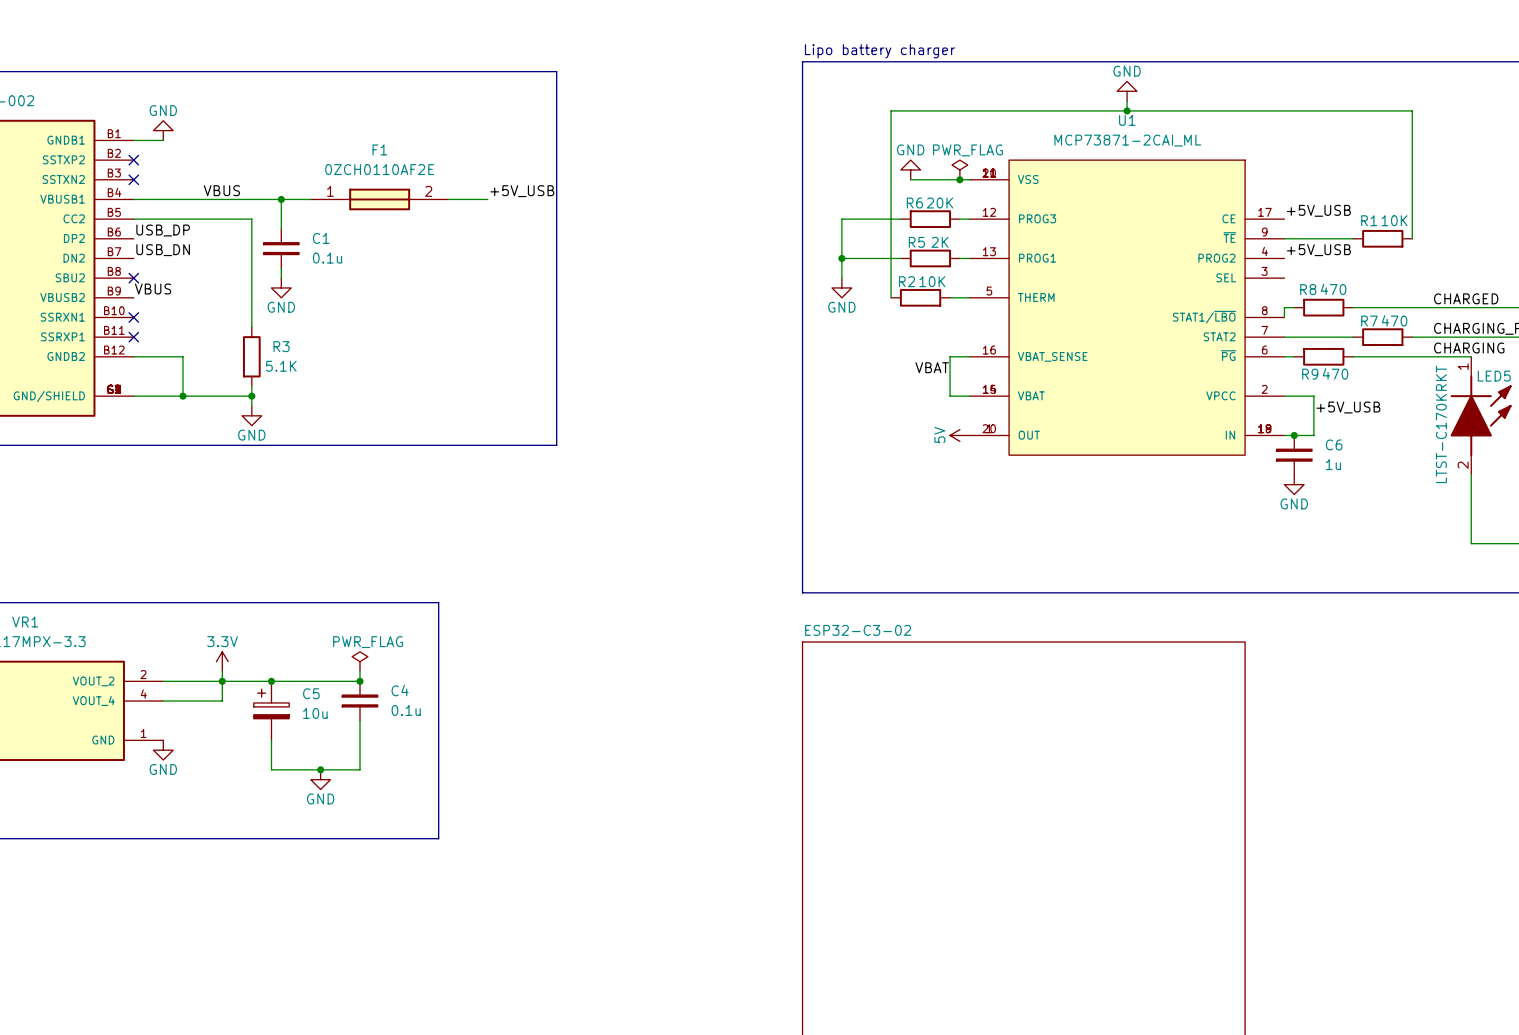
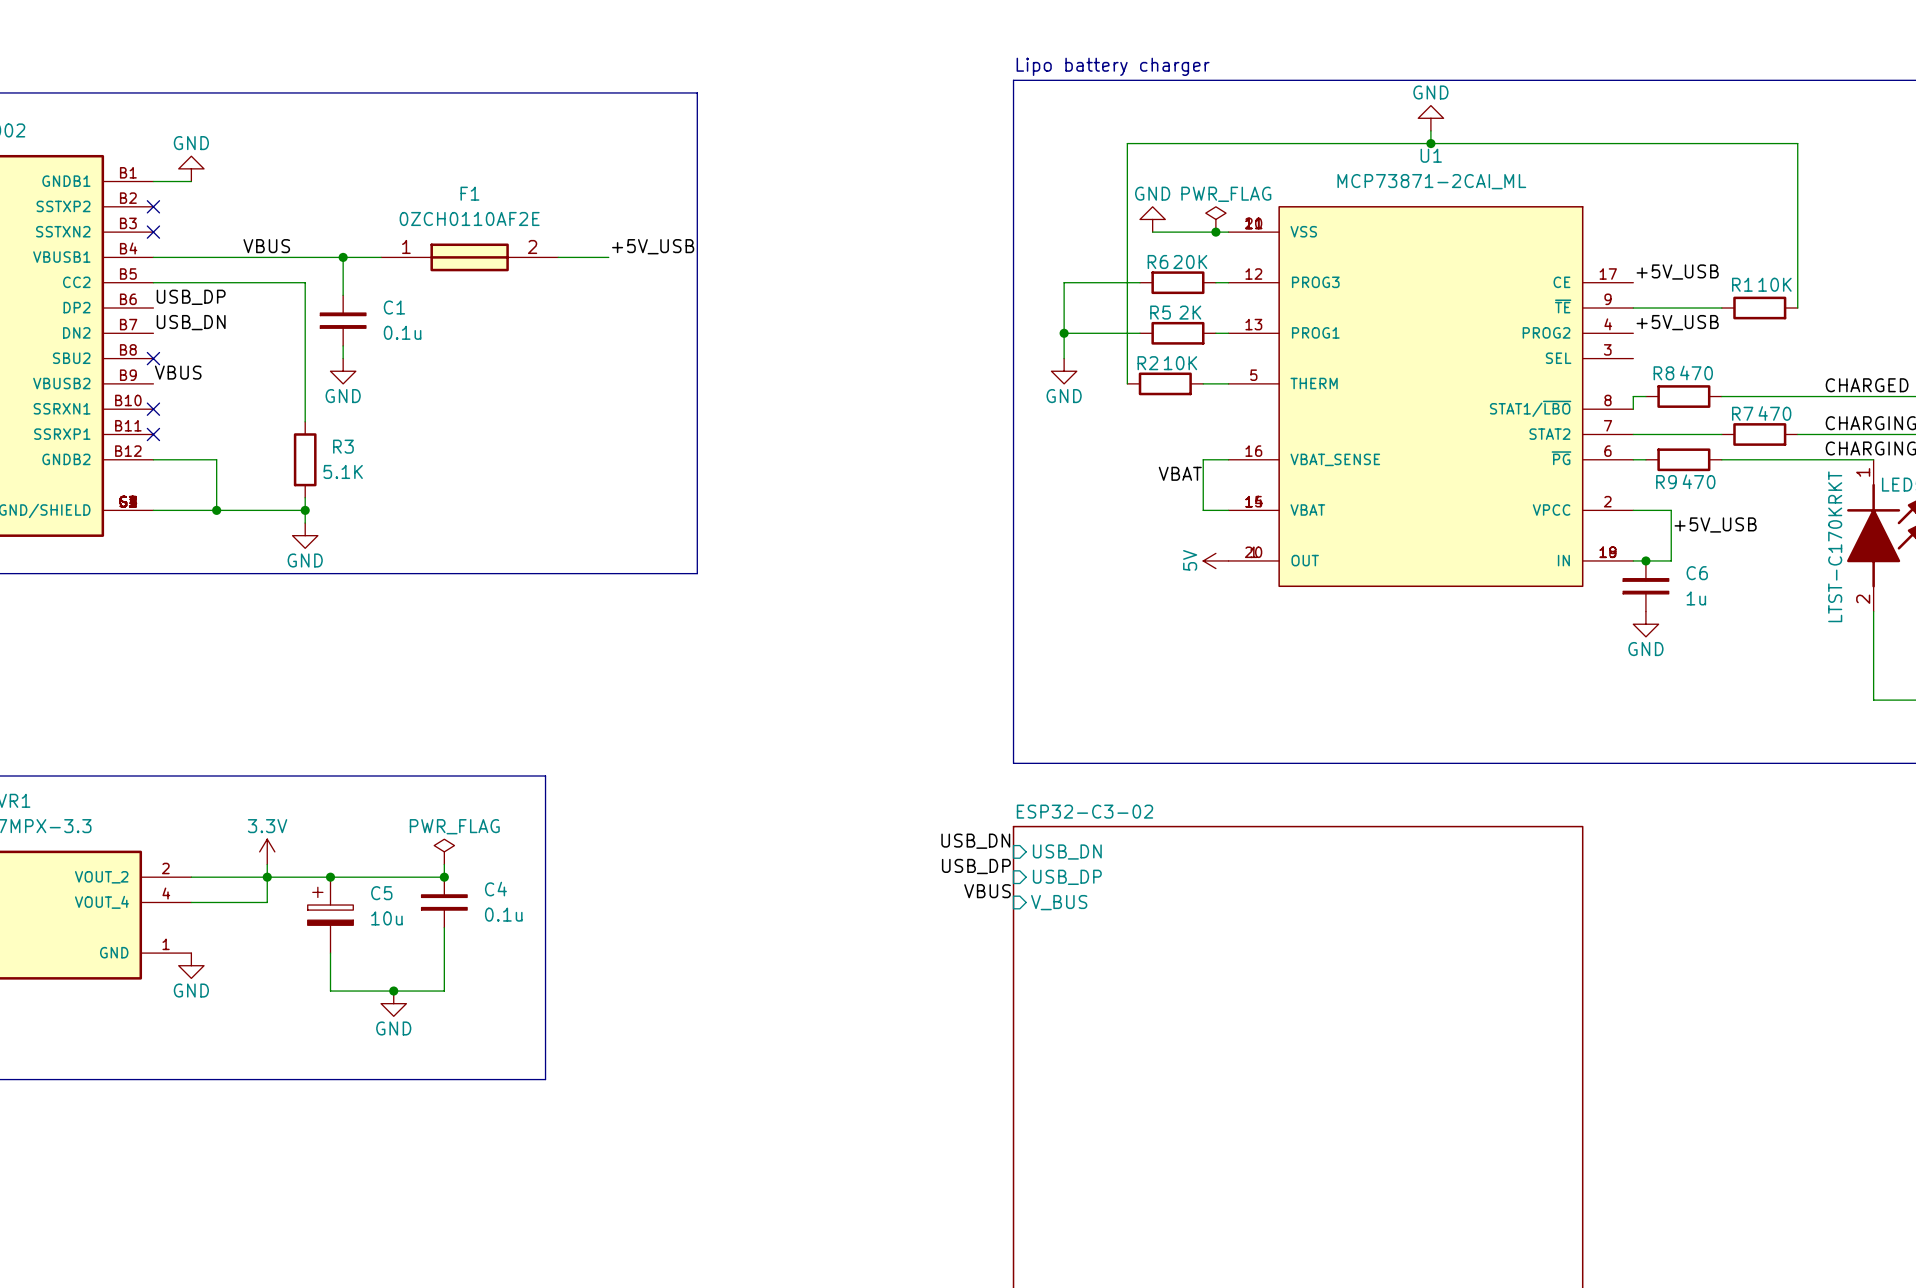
label: none -> USB_DN (975, 841)
sheet pin: none -> USB_DN (1067, 852)
label: none -> USB_DP (976, 866)
sheet pin: none -> USB_DP (1067, 877)
label: none -> VBUS (987, 891)
sheet pin: none -> V_BUS (1059, 902)

